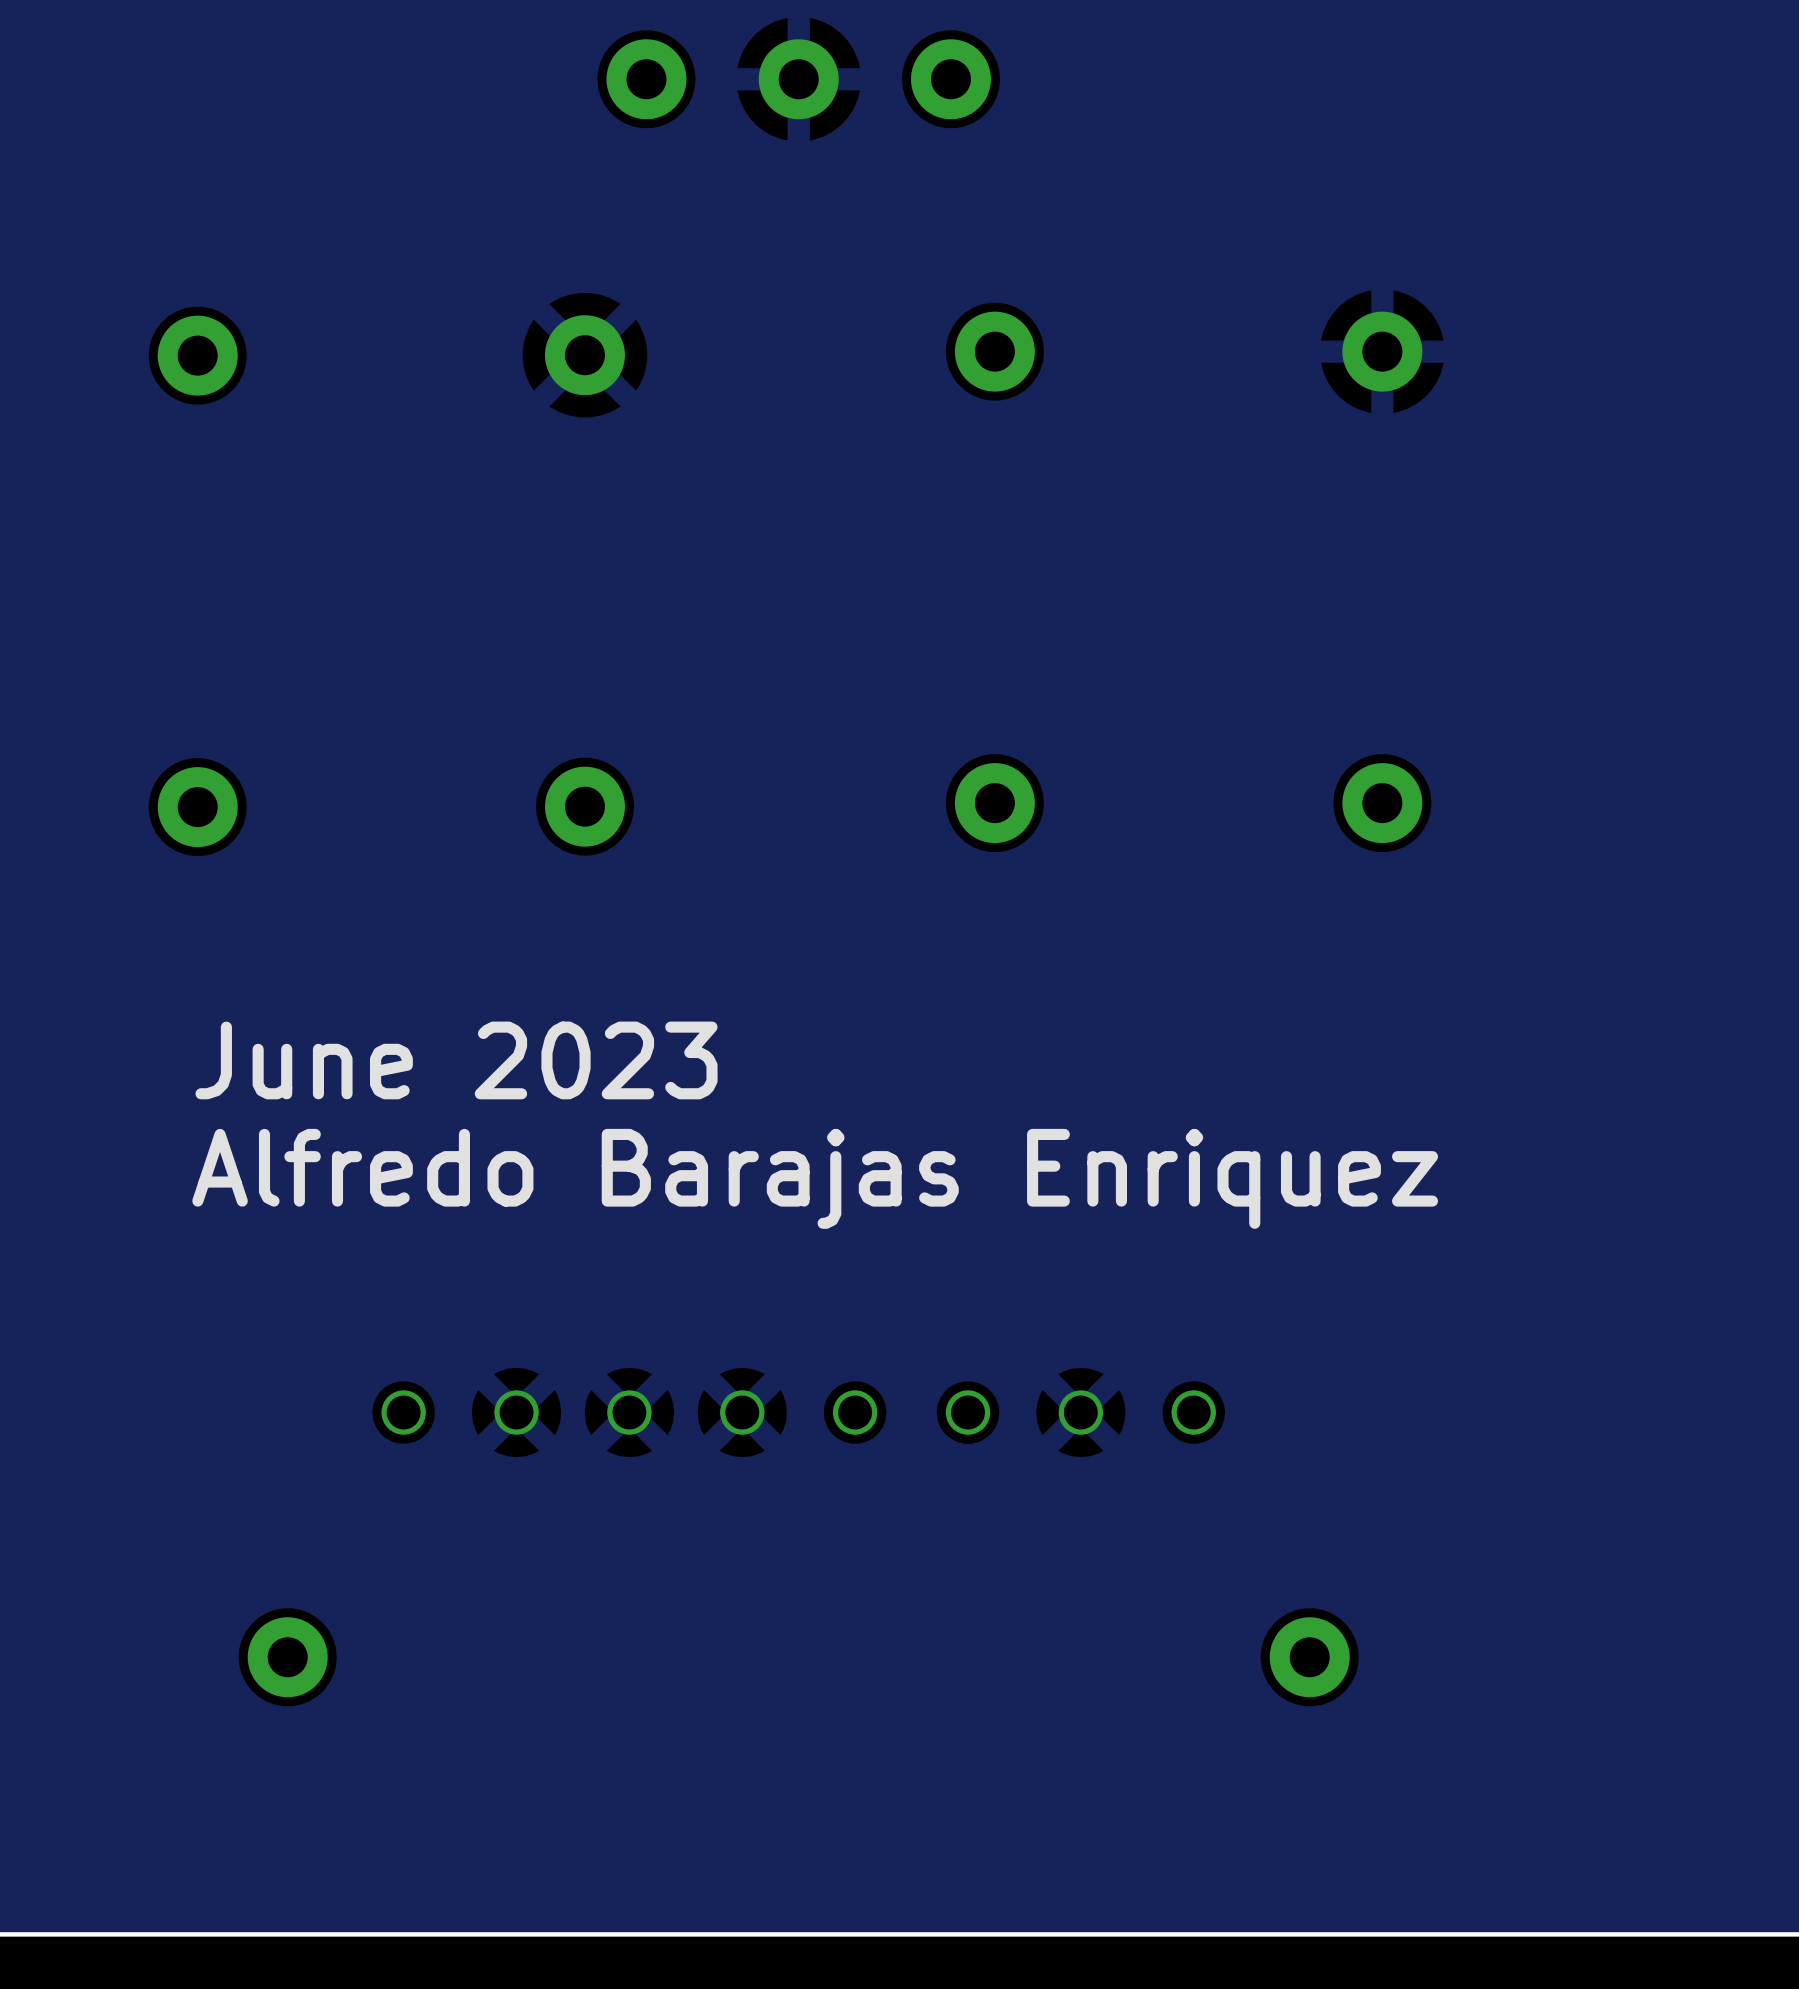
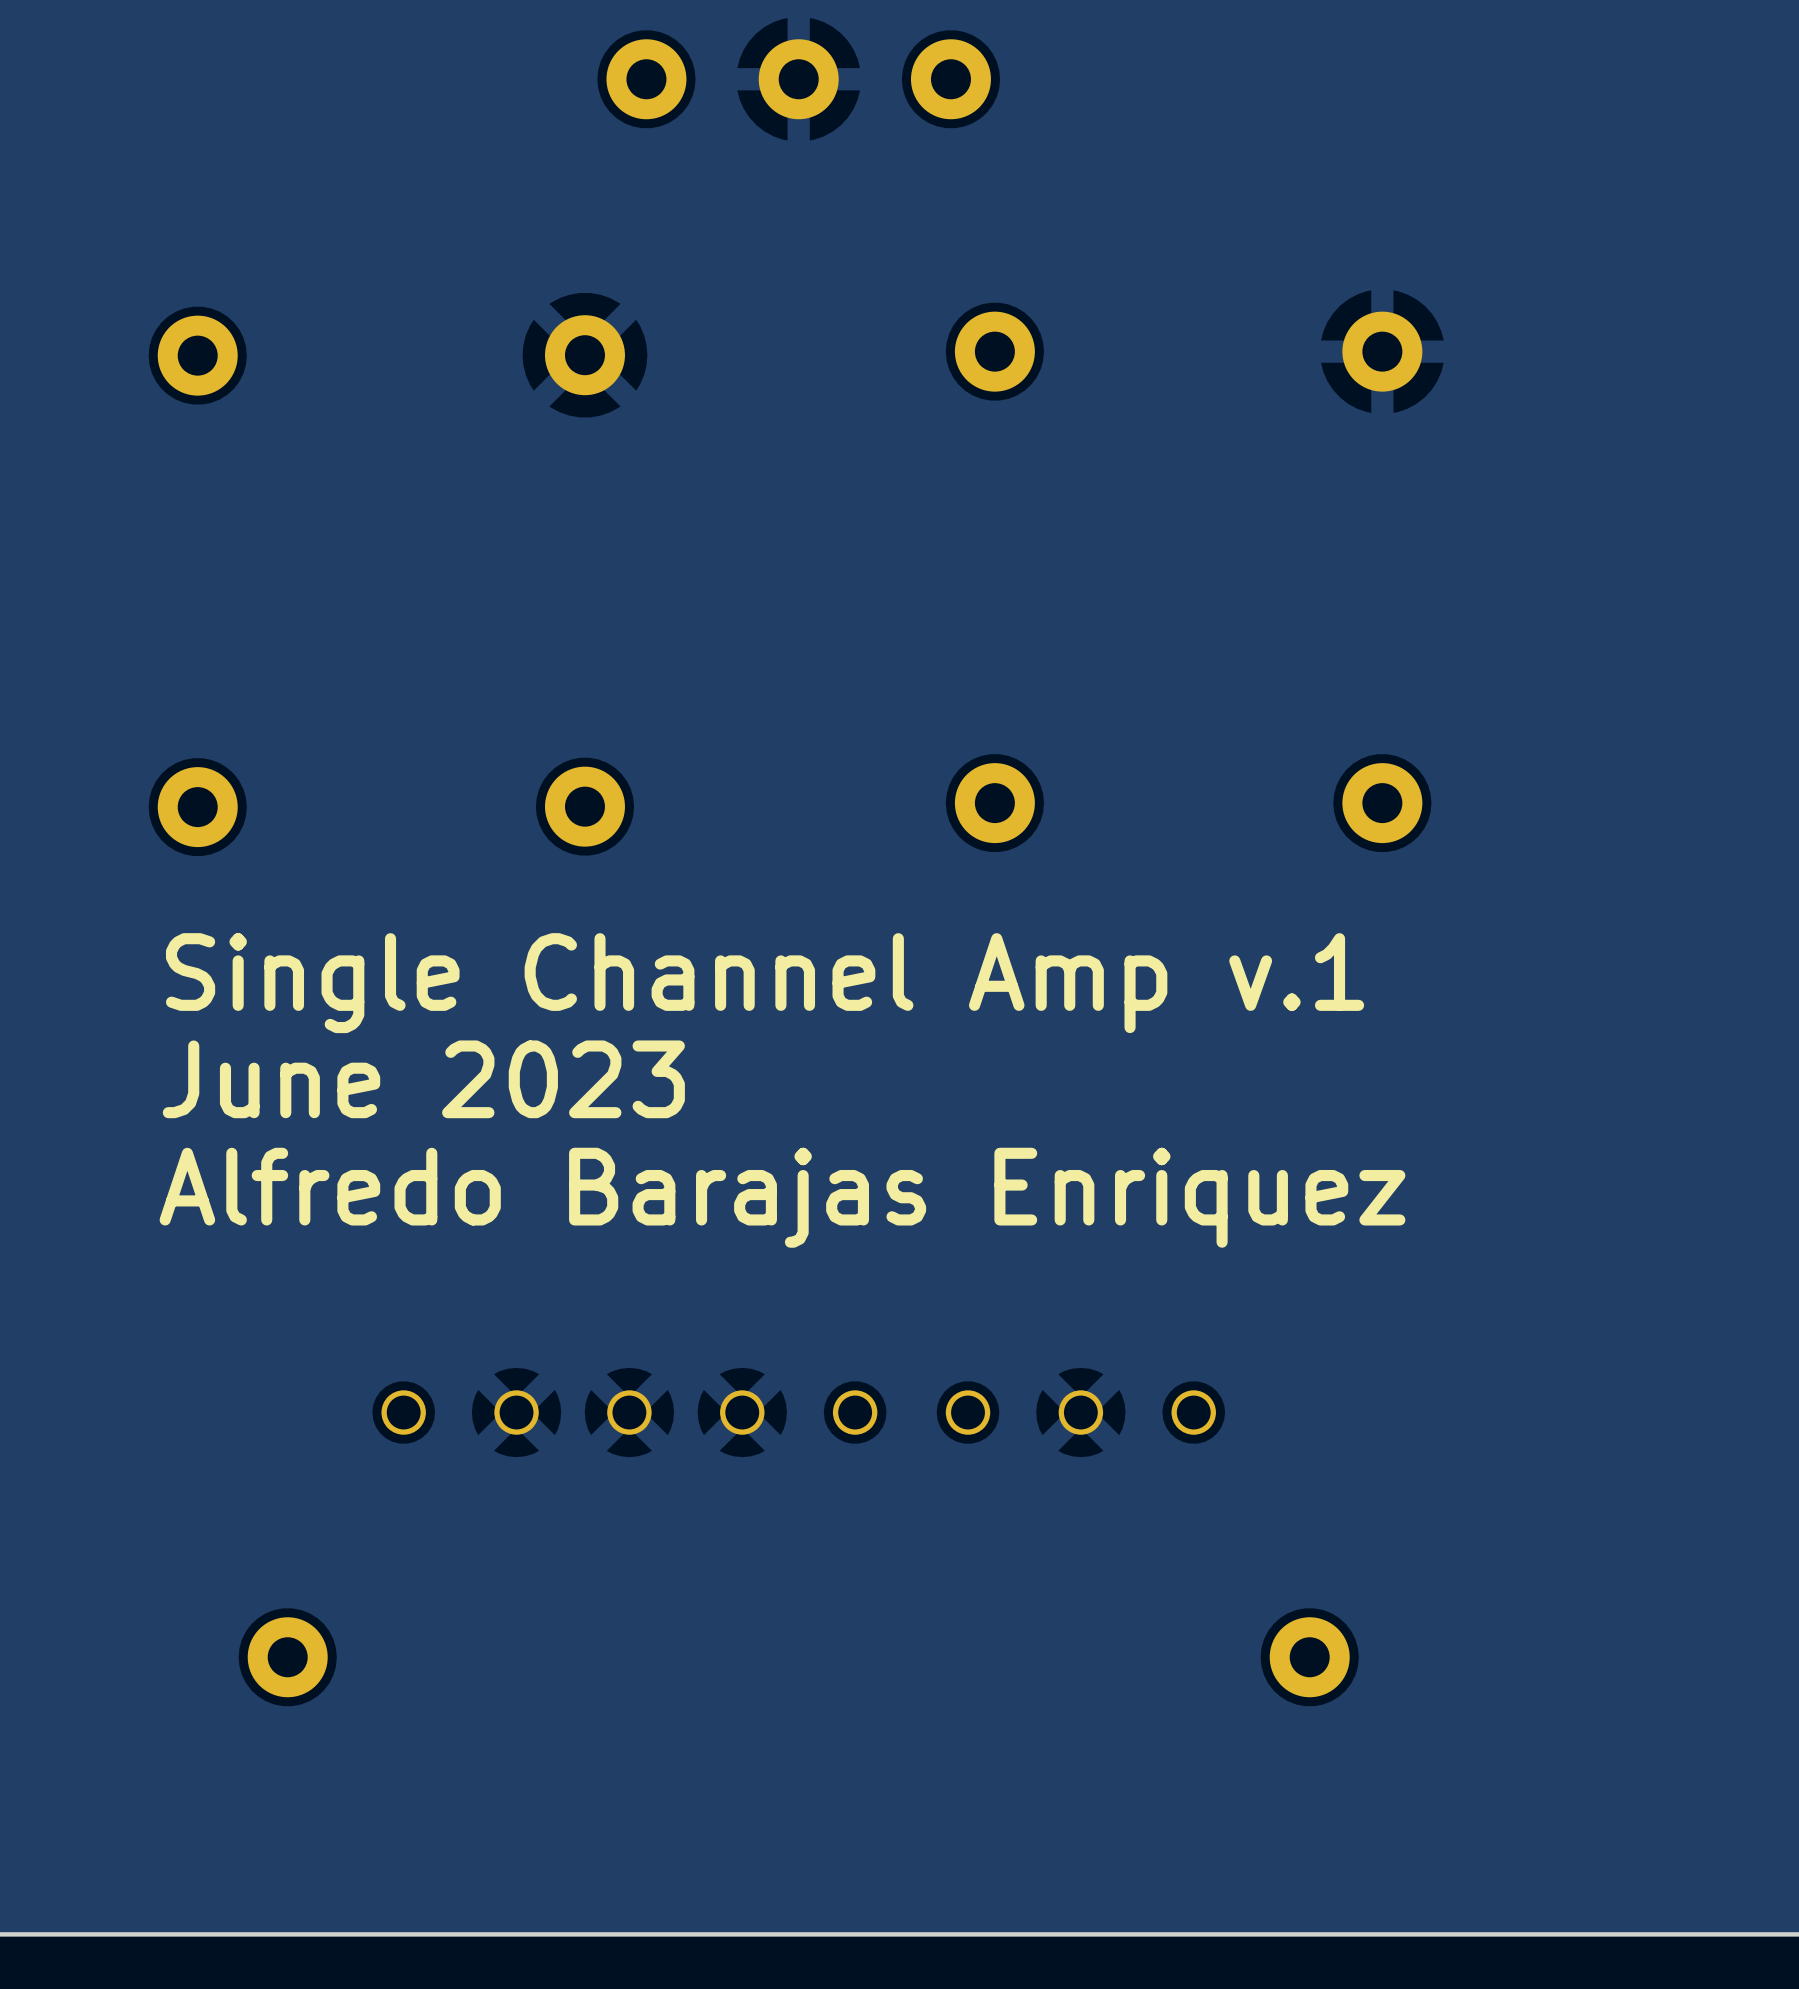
text: none -> Single Channel Amp v.1 (765, 983)
text position: June 2023 (456, 1060) -> June 2023 (423, 1079)
text position: Alfredo Barajas Enriquez (815, 1178) -> Alfredo Barajas Enriquez (782, 1197)

